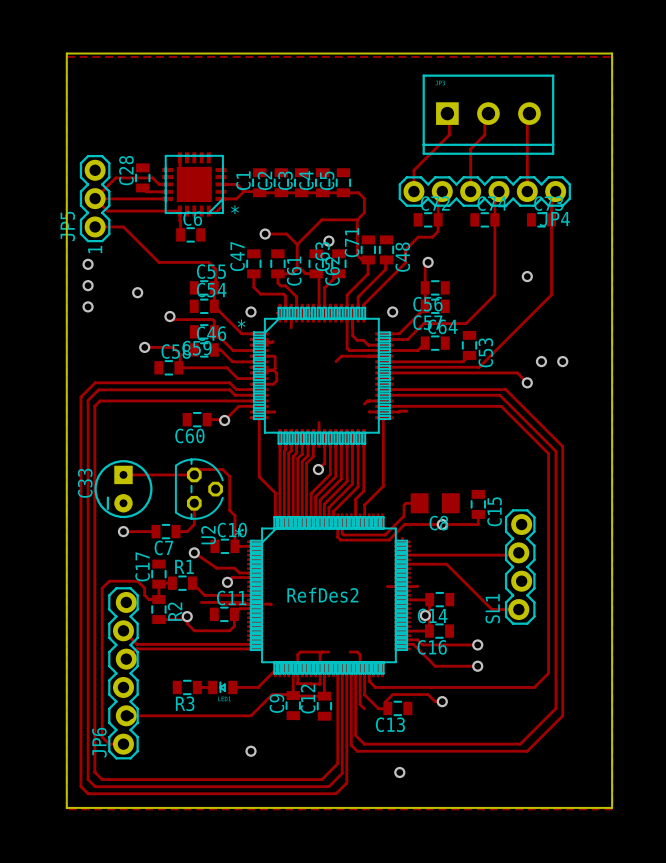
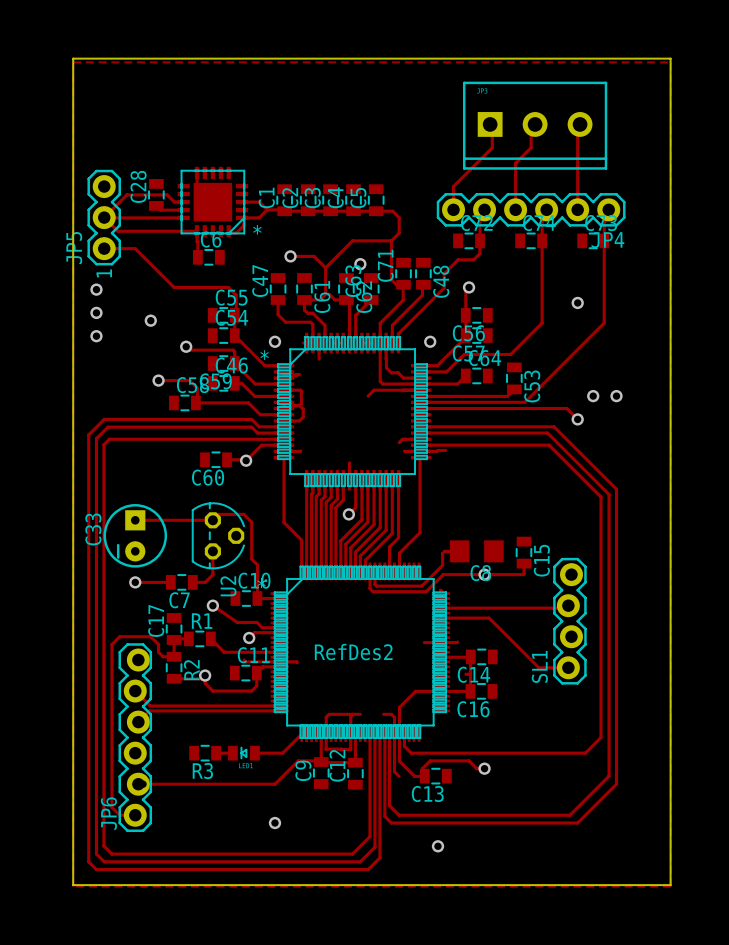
track: (201, 602) (243, 602) (245, 604) -> none
via: (425, 615) -> none
track: none -> (441, 691) (415, 691) (399, 707) (399, 732)
track: (402, 639) (417, 639) (422, 644) (477, 644) -> none
track: (402, 644) (413, 644) (435, 666) (477, 666) -> none
via: (477, 644) -> none
via: (477, 666) -> none

